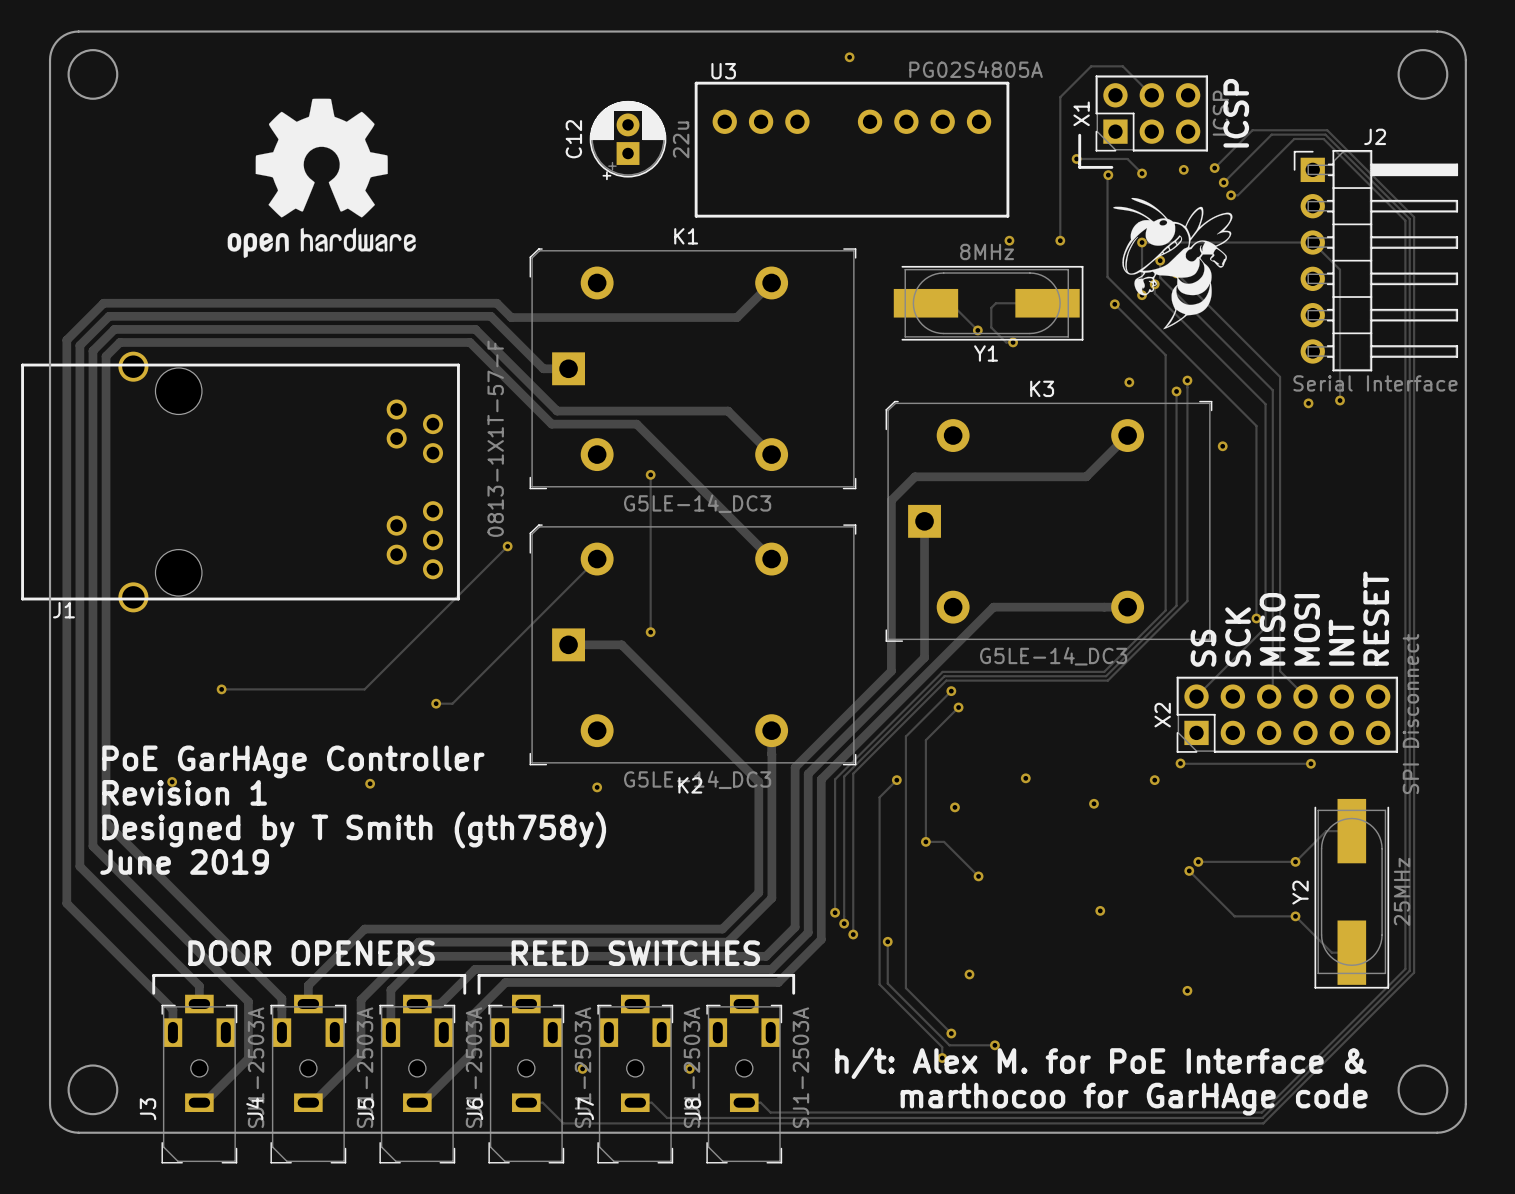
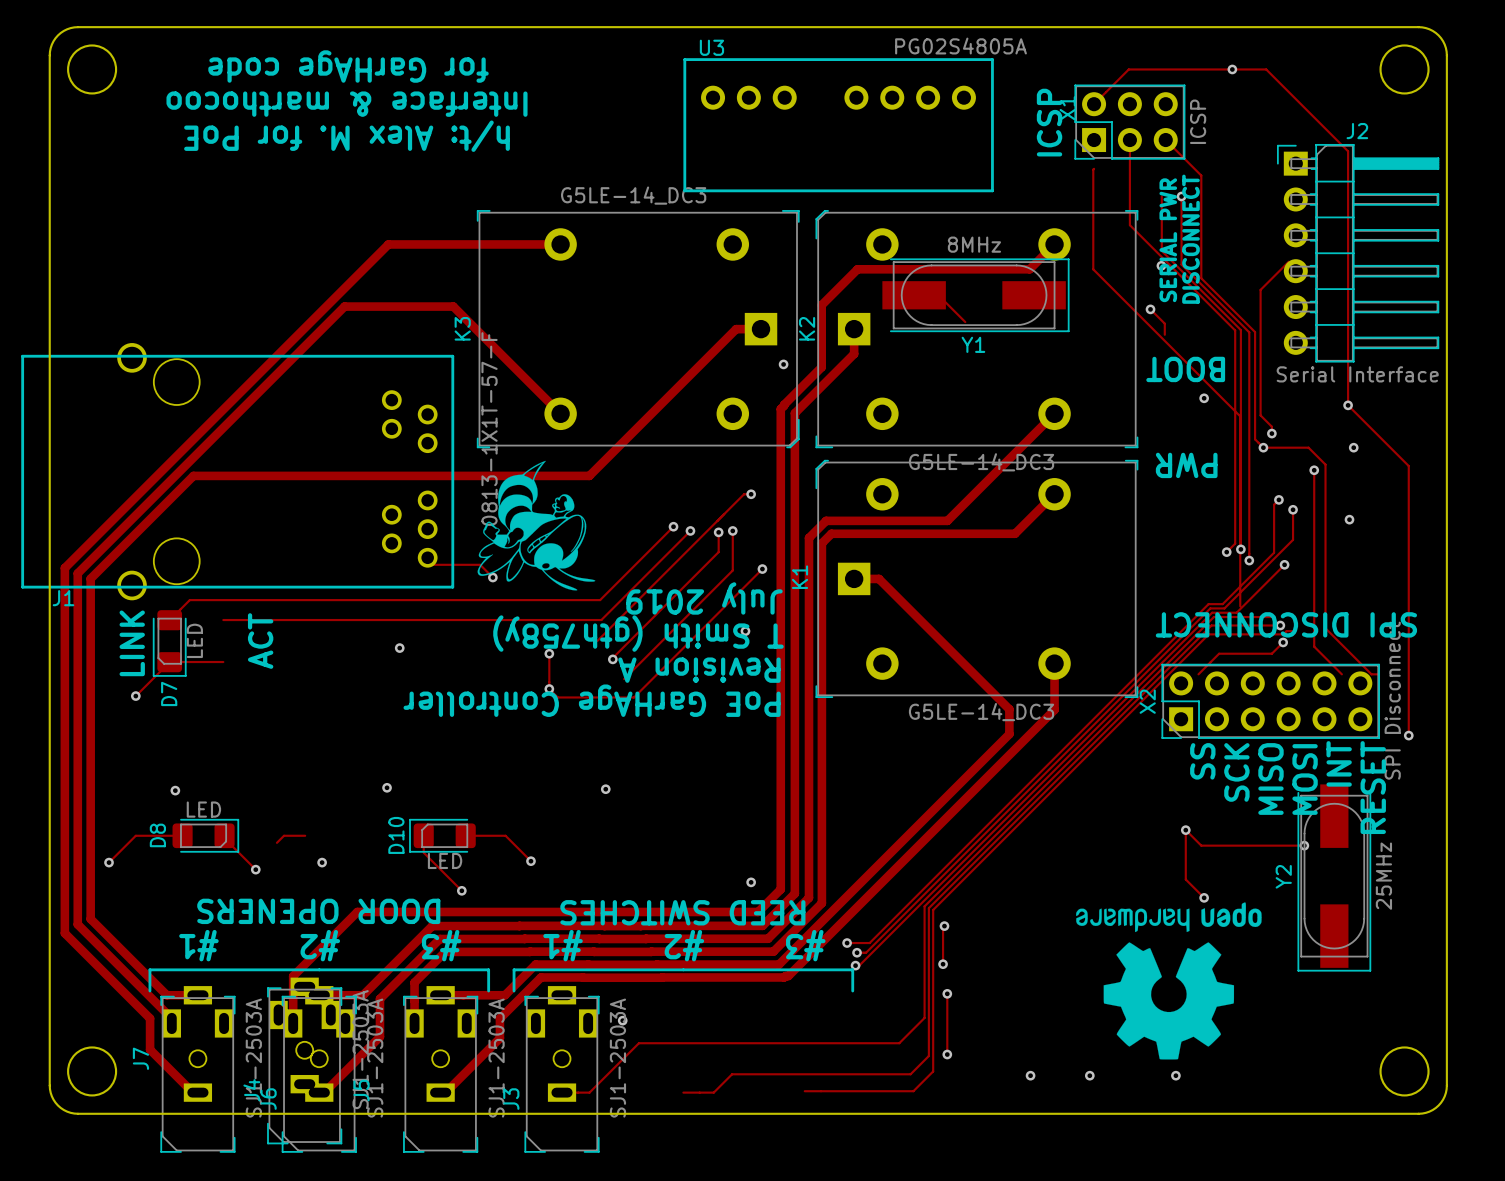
via: (849, 57) -> none
text: none -> for GarHAge code (348, 66)
via: none -> (1232, 69)
track: (1151, 95) (1122, 66) (1091, 66) (1060, 97) (1060, 240) -> none
drawing: [227, 98, 416, 258] -> none
text: none -> Interface & marthocoo (347, 104)
track: none -> (1094, 104) (1128, 69) (1266, 69) (1348, 151) (1348, 405) (1408, 466) (1408, 735)
X1 position: (1151, 113) -> (1129, 122)
text position: ICSP (1236, 113) -> ICSP (1049, 122)
line: (1079, 135) (1079, 167) (1111, 167) -> none
C12: 22u (628, 140) -> none
text: none -> h/t: Alex M. for PoE (347, 136)
track: none -> (1129, 140) (1129, 225) (1235, 330) (1235, 543) (1226, 552)
track: none -> (1165, 140) (1201, 175) (1201, 278) (1255, 332) (1255, 439) (1263, 447) (1308, 447) (1325, 464) (1325, 628) (1371, 674) (1377, 674)
U3 position: (852, 149) -> (838, 125)
track: (1076, 158) (1127, 158) (1142, 173) -> none
via: (1076, 158) -> none
track: (1214, 168) (1252, 130) (1327, 130) (1414, 217) (1414, 972) (1263, 1123) (563, 1123) (542, 1102) (526, 1102) -> none
via: (1214, 168) -> none
via: (1183, 169) -> none
via: (1142, 173) -> none
via: (1108, 175) -> none
track: (1223, 182) (1271, 134) (1325, 134) (1409, 218) (1409, 970) (1262, 1117) (667, 1117) (651, 1102) (635, 1102) -> none
via: (1223, 182) -> none
track: (1231, 195) (1237, 195) (1294, 138) (1323, 138) (1405, 220) (1405, 969) (1261, 1112) (770, 1112) (760, 1102) (744, 1102) -> none
via: (1231, 195) -> none
drawing: [1113, 197, 1233, 330] -> none
track: none -> (1161, 196) (1161, 250) (1240, 330) (1240, 549)
track: none -> (1181, 196) (1181, 264) (1249, 332) (1249, 560)
via: none -> (1181, 196)
K1 name rotation: 0° (686, 236) -> 90° counterclockwise (800, 577)
K1 name position: K1 (686, 236) -> K1 (800, 577)
via: (1009, 240) -> none
via: (1060, 240) -> none
via: (1142, 242) -> none
text: none -> DISCONNECT (1190, 239)
text: none -> SERIAL PWR (1168, 240)
track: none -> (560, 244) (388, 244) (64, 568) (64, 933) (150, 1018) (150, 1049) (192, 1092) (197, 1092)
track: none -> (1054, 244) (1029, 269) (857, 269) (821, 305) (821, 367) (780, 409) (780, 889) (758, 911) (357, 911) (293, 976) (293, 1023)
track: (1160, 260) (1160, 277) (1272, 390) (1272, 692) (1269, 696) -> none
via: (1160, 260) -> none
track: none -> (1288, 261) (1260, 289) (1260, 415) (1271, 426) (1271, 433)
track: (1176, 273) (1280, 376) (1280, 671) (1305, 696) -> none
track: (771, 282) (737, 317) (511, 317) (496, 303) (103, 303) (66, 340) (66, 903) (172, 1009) (172, 1032) -> none
track: (1154, 284) (1154, 293) (1265, 404) (1265, 627) (1196, 696) -> none
via: (1154, 284) -> none
track: (1142, 295) (1142, 242) (1312, 242) (1340, 269) (1340, 400) -> none
via: (1142, 295) -> none
track: (1047, 303) (995, 303) (991, 307) (991, 327) (1006, 342) (1013, 342) -> none
track: (1114, 304) (1165, 355) (1165, 610) (1104, 671) (942, 671) (835, 779) (835, 912) -> none
via: (1114, 304) -> none
track: none -> (1150, 309) (1164, 323) (1164, 334)
via: none -> (1150, 309)
via: (977, 330) -> none
track: none -> (761, 329) (736, 329) (589, 475) (193, 475) (90, 578) (90, 919) (166, 995) (197, 995)
track: none -> (854, 329) (854, 353) (794, 413) (794, 893) (762, 925) (432, 926) (363, 995) (319, 995)
via: (1013, 342) -> none
track: (568, 368) (543, 368) (490, 316) (109, 316) (79, 345) (79, 866) (199, 986) (199, 1004) -> none
K1 position: (692, 368) -> (976, 578)
via: none -> (783, 364)
text: none -> BOOT (1185, 369)
track: (1187, 380) (1187, 601) (1107, 680) (946, 680) (853, 773) (853, 934) -> none
via: (1187, 380) -> none
via: (1129, 382) -> none
K3 name position: K3 (1042, 388) -> K3 (462, 328)
track: (1176, 391) (1176, 605) (1106, 676) (944, 676) (844, 776) (844, 923) -> none
via: (1176, 391) -> none
via: (1340, 400) -> none
via: (1308, 403) -> none
via: none -> (1204, 398)
via: none -> (1348, 405)
track: none -> (560, 413) (453, 306) (344, 306) (77, 573) (77, 924) (171, 1018) (171, 1023)
track: none -> (1054, 413) (947, 520) (826, 520) (808, 538) (808, 897) (768, 938) (439, 939) (379, 998) (379, 1036) (324, 1092) (319, 1092)
track: (1127, 435) (1086, 476) (915, 476) (891, 500) (891, 671) (795, 767) (795, 927) (766, 956) (424, 956) (390, 990) (390, 1032) -> none
via: none -> (1271, 433)
via: (1222, 446) -> none
track: (771, 454) (728, 411) (557, 411) (475, 329) (114, 329) (92, 350) (92, 846) (248, 1001) (248, 1058) (204, 1102) (199, 1102) -> none
via: none -> (1263, 447)
via: none -> (1353, 447)
drawing: none -> [477, 460, 596, 591]
track: (650, 474) (650, 632) -> none
via: (650, 474) -> none
text: none -> PWR (1186, 465)
track: none -> (1314, 470) (1314, 646) (1341, 674)
via: none -> (1314, 470)
track: none -> (751, 494) (744, 494) (597, 641)
via: none -> (751, 494)
track: none -> (1054, 494) (1015, 533) (831, 533) (821, 543) (821, 903) (773, 951) (445, 951) (414, 982) (414, 1023)
track: none -> (1278, 499) (1274, 504) (1274, 552) (1222, 604) (1208, 604) (869, 943) (847, 943)
via: none -> (1278, 499)
track: none -> (1293, 509) (1293, 539) (1224, 608) (1210, 608) (866, 952) (857, 952)
via: none -> (1293, 509)
track: (924, 521) (924, 657) (808, 773) (808, 932) (771, 969) (474, 969) (440, 1004) (417, 1004) -> none
K3 rotation: 0° (1048, 521) -> 180° (638, 329)
K3 position: (1048, 521) -> (638, 329)
via: none -> (1349, 519)
track: none -> (673, 526) (600, 600) (189, 600) (169, 620)
via: none -> (673, 526)
track: none -> (690, 530) (601, 620) (223, 620)
via: none -> (690, 530)
track: none -> (732, 530) (732, 570) (624, 679)
via: none -> (732, 530)
track: none -> (718, 532) (718, 552) (612, 659)
via: none -> (718, 532)
track: (507, 546) (364, 689) (221, 689) -> none
via position: (507, 546) -> (492, 577)
track: (597, 559) (452, 703) (436, 703) -> none
track: (771, 559) (636, 424) (551, 424) (470, 342) (119, 342) (106, 356) (106, 822) (281, 998) (281, 1032) -> none
via: none -> (1240, 549)
via: none -> (1226, 552)
via: none -> (1249, 560)
track: none -> (427, 564) (480, 564) (492, 577)
track: none -> (1284, 564) (1236, 612) (1212, 612) (859, 965) (855, 965)
via: none -> (1284, 564)
track: none -> (762, 569) (634, 697) (557, 697) (549, 689) (549, 653)
via: none -> (762, 569)
track: none -> (854, 578) (878, 578) (1009, 709) (1009, 734) (778, 964) (535, 964) (505, 995) (440, 995)
track: (1127, 607) (993, 607) (821, 779) (821, 939) (778, 982) (505, 982) (471, 1016) (471, 1053) (422, 1102) (417, 1102) -> none
text: none -> July 2019 (704, 598)
via: (1256, 618) -> none
text position: RESET (1376, 618) -> RESET (1373, 787)
text position: MISO (1272, 629) -> MISO (1270, 778)
track: none -> (1271, 617) (1213, 617) (924, 906) (924, 1017) (899, 1043) (638, 1043) (589, 1092) (562, 1092)
text position: MOSI (1307, 629) -> MOSI (1305, 779)
via: (650, 632) -> none
text position: SCK (1238, 637) -> SCK (1236, 772)
track: none -> (1280, 625) (1211, 625) (928, 908) (928, 1056) (910, 1074) (732, 1074) (713, 1092) (683, 1092)
via: none -> (1280, 625)
text: none -> SPI DISCONNECT (1286, 624)
text position: INT (1341, 642) -> INT (1339, 763)
via: none -> (745, 631)
track: none -> (1294, 631) (1286, 631) (1283, 634) (1208, 634) (933, 909) (933, 1071) (913, 1091) (804, 1091)
track: (568, 644) (621, 644) (758, 781) (758, 892) (722, 929) (364, 929) (308, 985) (308, 1004) -> none
K2 position: (692, 644) -> (976, 329)
text: none -> T Smith (gth758y) (638, 633)
text position: SS (1203, 648) -> SS (1202, 761)
text: none -> ACT (260, 641)
text: none -> LINK (132, 643)
track: none -> (1283, 642) (1271, 653) (1219, 653) (1198, 674)
via: none -> (1283, 642)
D7: none -> LED (169, 643)
via: none -> (549, 653)
via: none -> (612, 659)
track: none -> (223, 662) (169, 662) (135, 696)
track: none -> (1054, 663) (1054, 709) (788, 976) (541, 977) (499, 1018) (499, 1038) (445, 1092) (440, 1092)
text: none -> Revision A (699, 670)
via: (221, 689) -> none
track: (951, 691) (905, 736) (905, 988) (951, 1033) -> none
via: (951, 691) -> none
via: none -> (549, 689)
via position: (436, 703) -> (399, 648)
track: (958, 707) (925, 740) (925, 841) (944, 841) (978, 876) -> none
via: (958, 707) -> none
via: none -> (135, 696)
text: none -> PoE GarHAge Controller (592, 700)
track: (771, 730) (771, 898) (727, 942) (418, 942) (361, 999) (361, 1055) (313, 1102) (308, 1102) -> none
via: none -> (1408, 735)
text: PoE GarHAge Controller (293, 761) -> none
track: (1180, 763) (1310, 763) -> none
via: (1180, 763) -> none
via: (1310, 763) -> none
via: (1025, 778) -> none
track: (896, 780) (879, 797) (879, 984) (942, 1047) (942, 1058) -> none
via: (896, 780) -> none
via: (1154, 780) -> none
via position: (172, 781) -> (175, 790)
via position: (370, 783) -> (387, 787)
K2 name rotation: 0° (690, 785) -> 90° counterclockwise (807, 328)
K2 name position: K2 (690, 785) -> K2 (807, 328)
via position: (597, 787) -> (605, 789)
text: Revision 1 (184, 792) -> none
via: (1094, 803) -> none
via: (954, 807) -> none
text: Designed by T Smith (gth758y) (354, 829) -> none
track: (1351, 831) (1326, 831) (1295, 861) (1198, 861) -> none
via: (925, 841) -> none
via: none -> (1185, 830)
track: none -> (182, 835) (135, 835) (109, 862)
D8: none -> LED (205, 835)
track: none -> (224, 835) (224, 838) (255, 869)
track: none -> (305, 835) (284, 835) (276, 842)
track: none -> (423, 835) (423, 852) (461, 890)
D10: none -> LED (442, 835)
track: none -> (465, 835) (505, 835) (530, 861)
text: June 2019 (184, 861) -> none
via: (1198, 861) -> none
via position: (1295, 861) -> (1304, 845)
track: none -> (1304, 845) (1201, 845) (1185, 830) (1185, 879) (1204, 897)
track: (1189, 870) (1234, 916) (1295, 916) (1331, 952) (1351, 952) -> none
via: (1189, 870) -> none
via: none -> (530, 861)
via: (978, 876) -> none
via: none -> (109, 862)
via: none -> (322, 862)
via: none -> (255, 869)
via: none -> (751, 882)
via: none -> (461, 890)
via: (1100, 910) -> none
via: (835, 912) -> none
via: none -> (1204, 897)
via: (1295, 916) -> none
drawing: none -> [1076, 902, 1262, 1060]
via: (844, 923) -> none
via: (853, 934) -> none
track: (887, 941) (887, 983) (949, 1045) (994, 1045) -> none
via: (887, 941) -> none
track: none -> (944, 926) (943, 964)
via: none -> (944, 926)
text rotation: 0° (311, 953) -> 180° (318, 911)
text rotation: 0° (635, 953) -> 180° (682, 912)
via: none -> (847, 943)
text: none -> #1 (198, 945)
text: none -> #2 (320, 945)
text: none -> #3 (441, 945)
text: none -> #1 (563, 945)
text: none -> #2 (684, 945)
text: none -> #3 (805, 945)
via: none -> (857, 952)
via position: (969, 974) -> (943, 964)
via: none -> (855, 965)
via: (1187, 990) -> none
line: (153, 993) (153, 975) (464, 975) (464, 993) -> none
line: (479, 993) (479, 975) (793, 975) (793, 993) -> none
line: none -> (149, 991) (149, 969) (488, 969) (488, 991)
line: none -> (514, 991) (514, 969) (852, 969) (852, 991)
track: none -> (947, 993) (947, 1054)
via: none -> (947, 993)
via: (951, 1033) -> none
via: none -> (622, 1020)
via: (994, 1045) -> none
via: (942, 1058) -> none
text: h/t: Alex M. for PoE Interface & (1100, 1063) -> none
via: (582, 1068) -> none
via: (689, 1068) -> none
via: none -> (947, 1054)
J3 position: (199, 1079) -> (562, 1069)
J5 position: (417, 1079) -> (440, 1069)
J6 position: (526, 1079) -> (319, 1069)
J7 position: (635, 1079) -> (197, 1069)
J8: SJ1-2503A (744, 1079) -> none
via: none -> (1030, 1075)
via: none -> (1089, 1075)
via: none -> (1175, 1075)
text: marthocoo for GarHAge code (1134, 1099) -> none
J7 name position: J7 (585, 1108) -> J7 (140, 1058)

